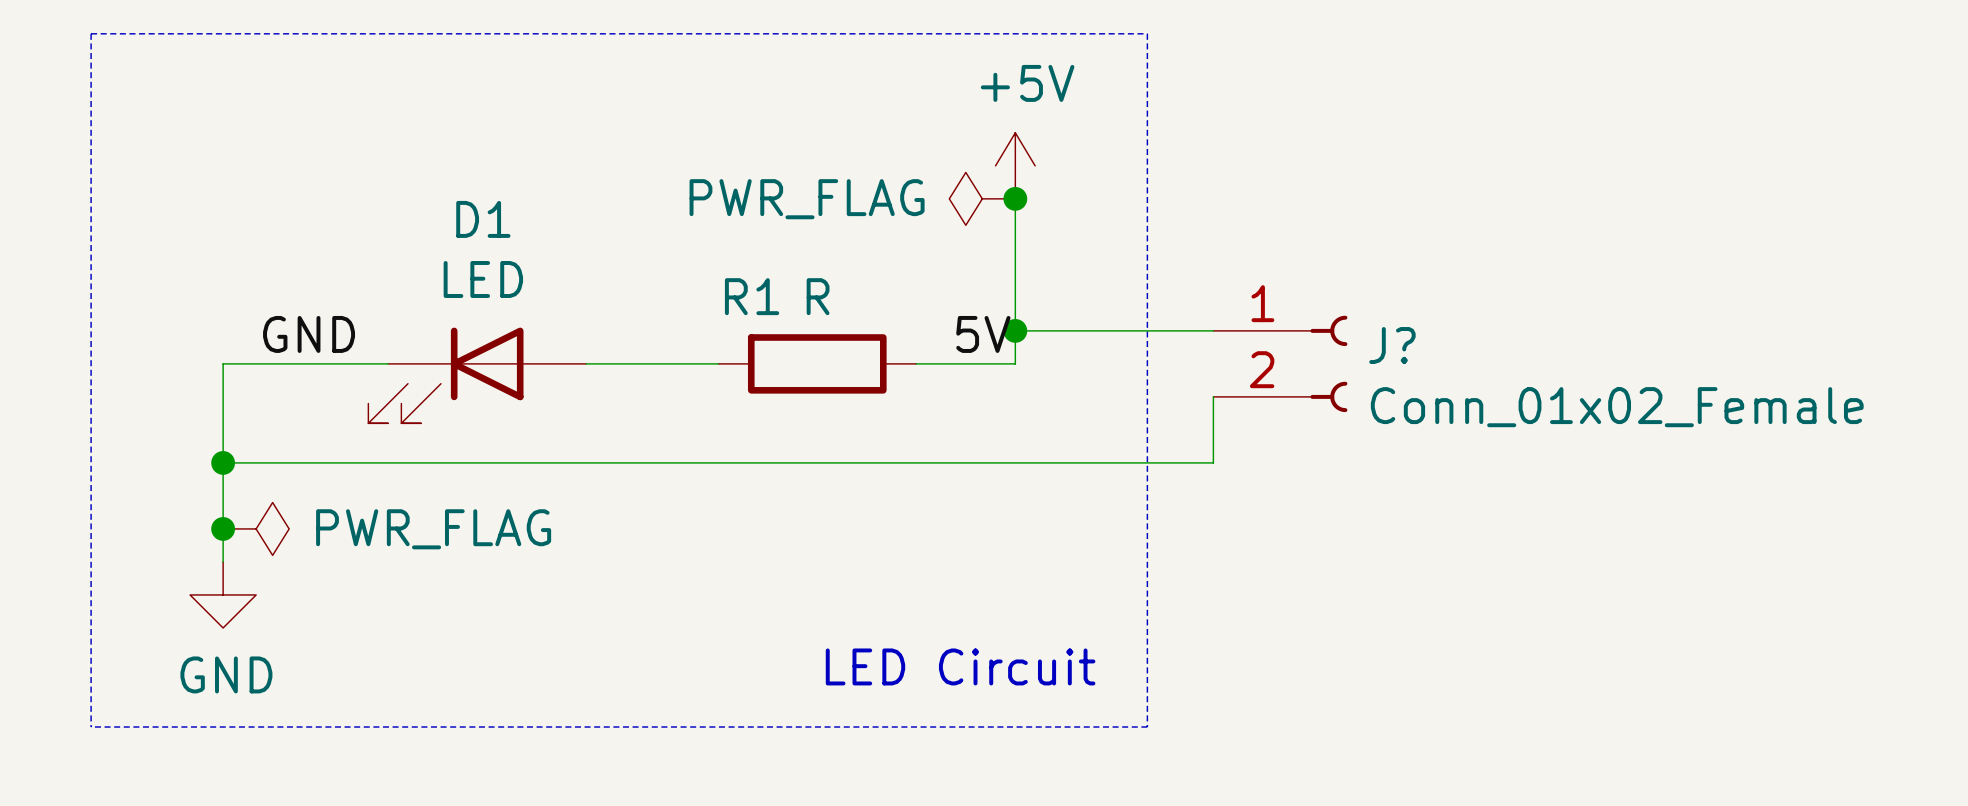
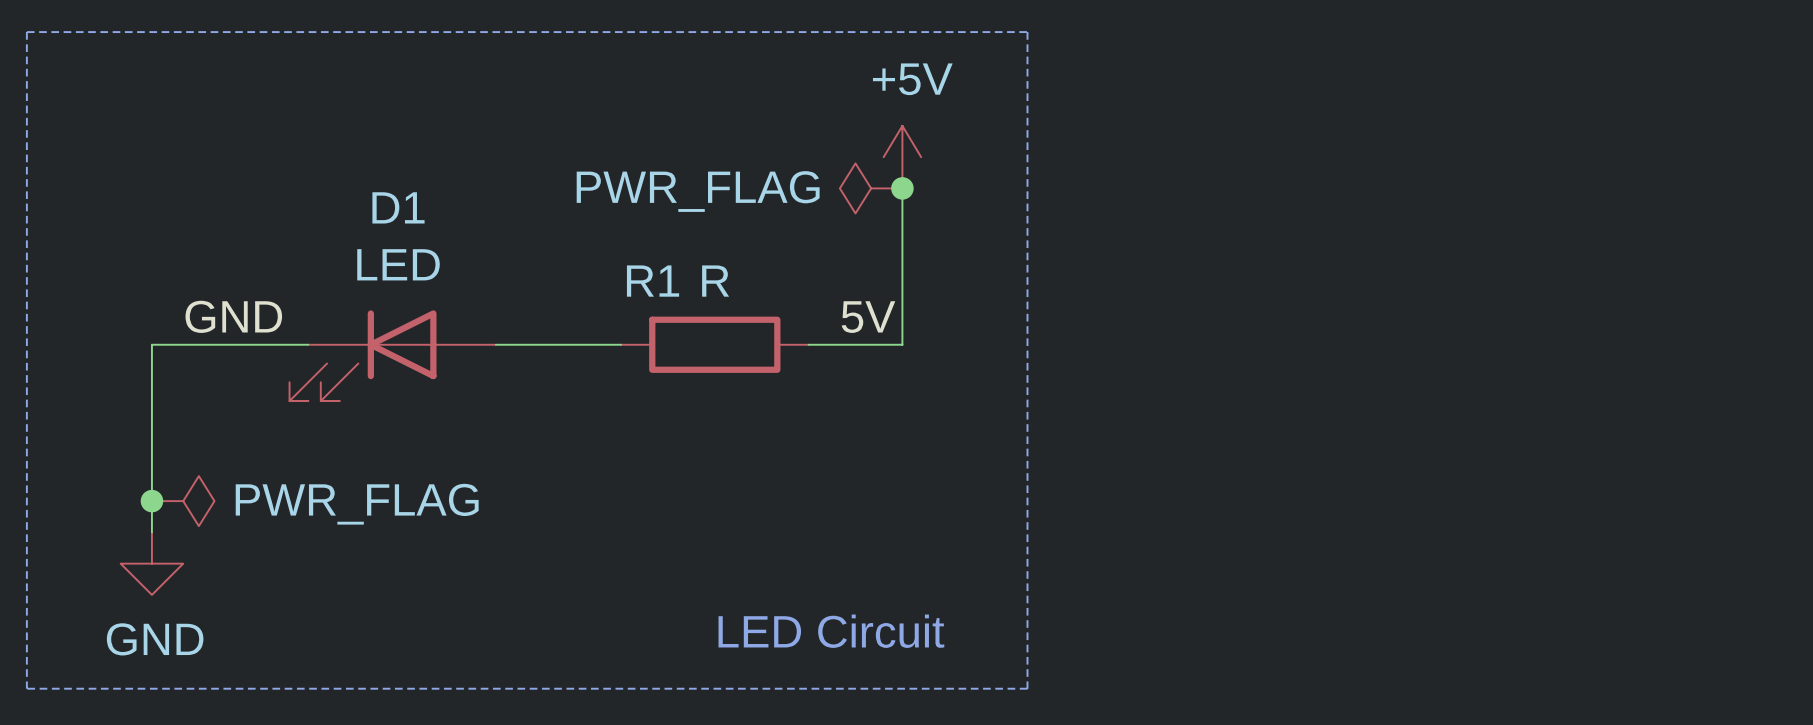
wire: (1015, 330) (1213, 330) -> none
junction: (1015, 330) -> none
J?: Conn_01x02_Female (1280, 363) -> none
wire: (1213, 396) (1213, 462) (223, 462) -> none
junction: (223, 462) -> none

